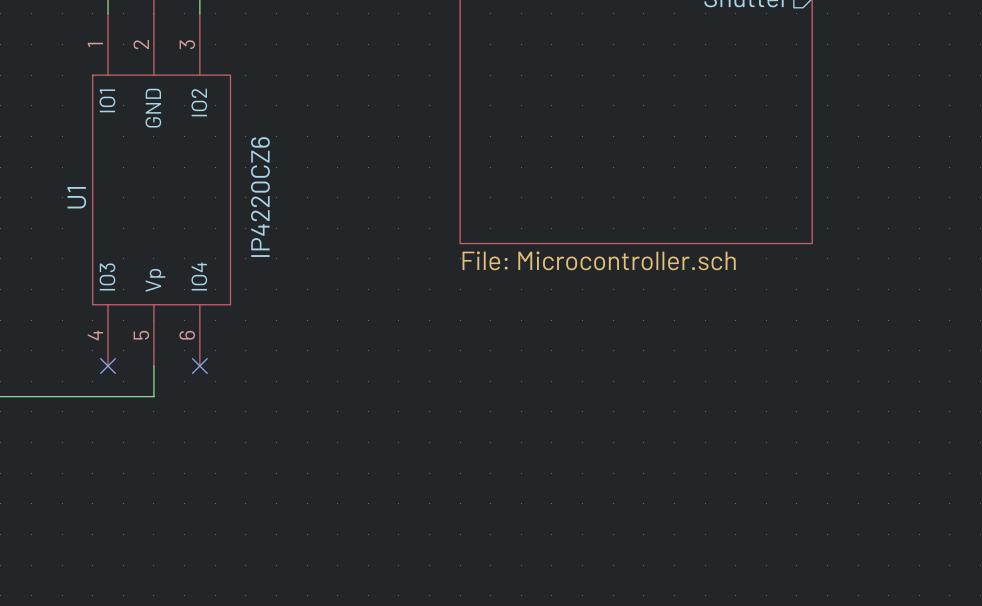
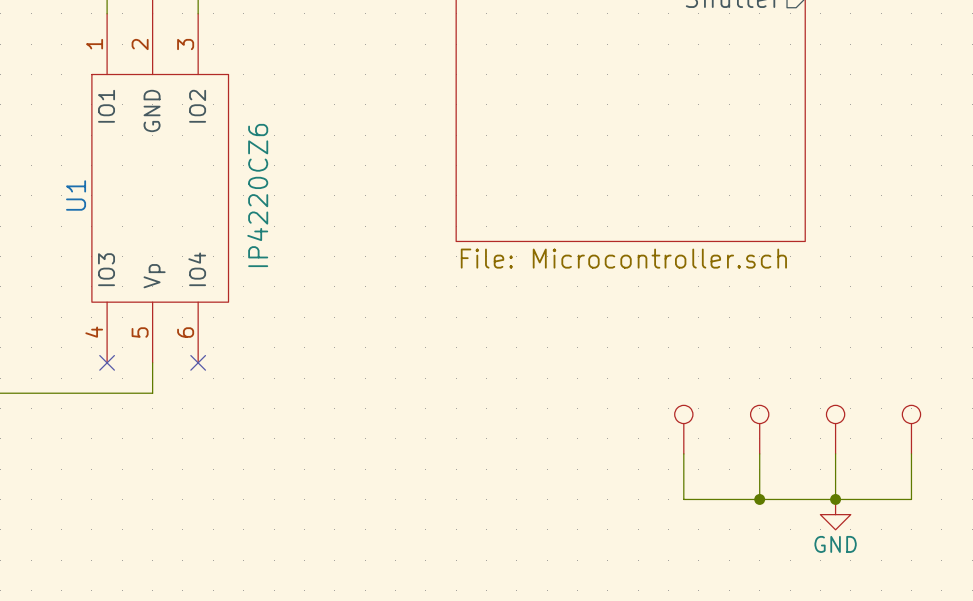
part: none -> (683, 429)
part: none -> (759, 429)
part: none -> (835, 429)
part: none -> (911, 429)
wire: none -> (683, 453) (683, 499) (911, 499) (911, 453)
wire: none -> (759, 453) (759, 499)
wire: none -> (835, 453) (835, 499)
junction: none -> (759, 499)
junction: none -> (835, 499)
power symbol: none -> GND (835, 514)

